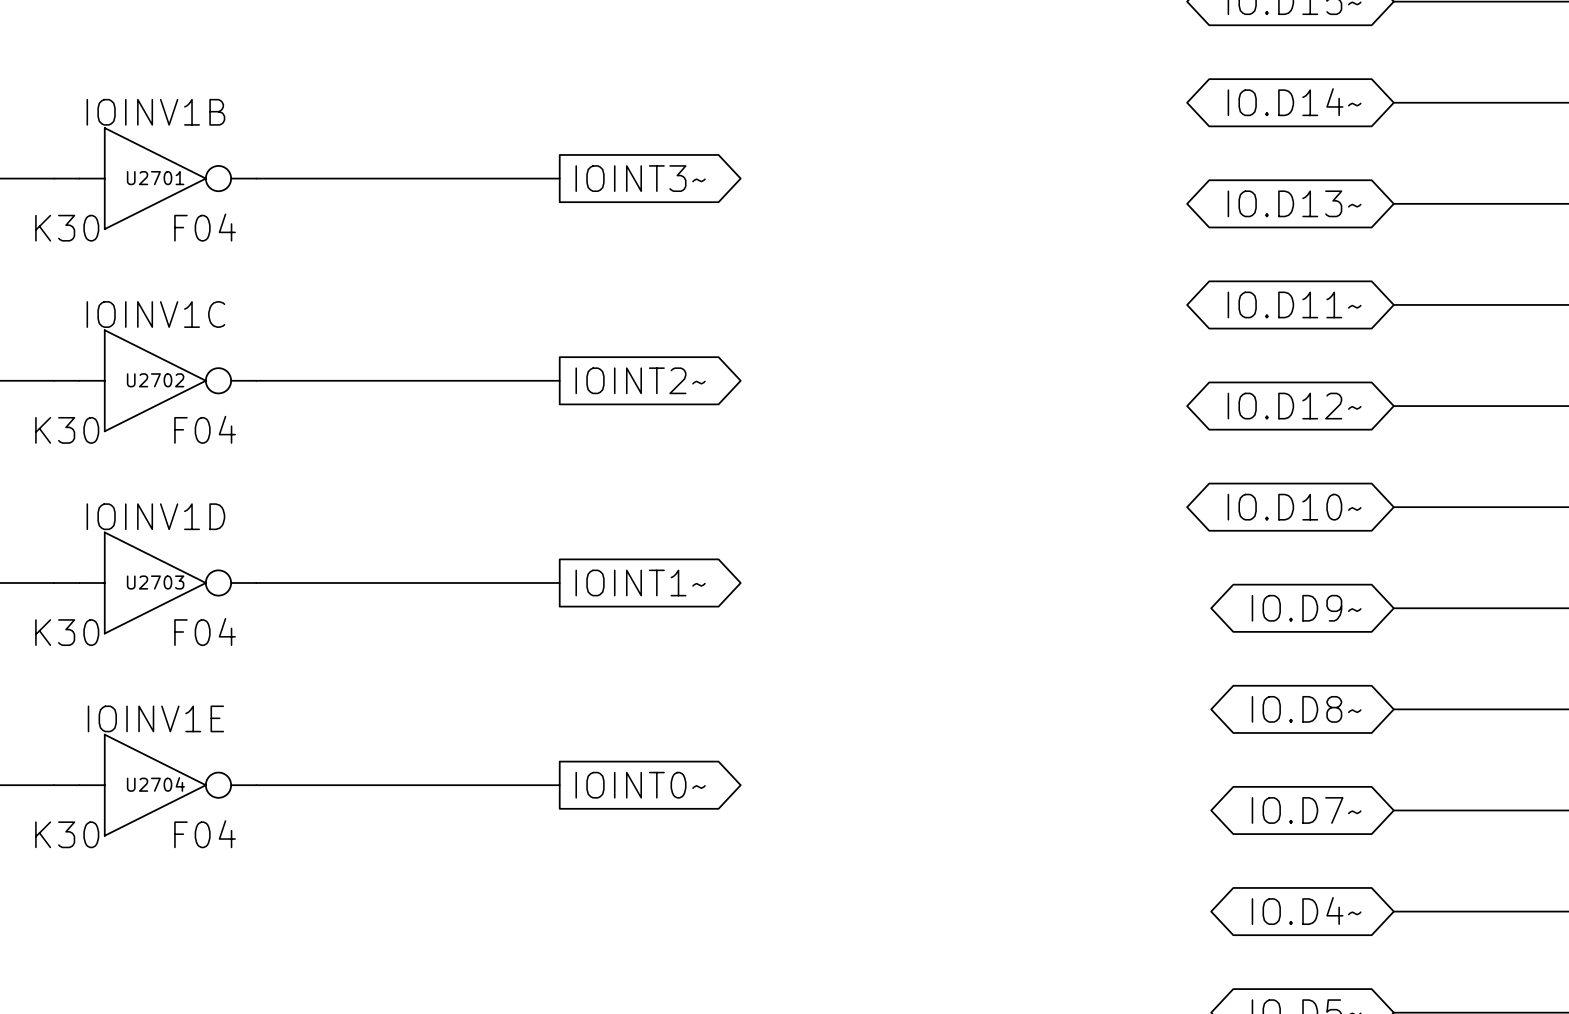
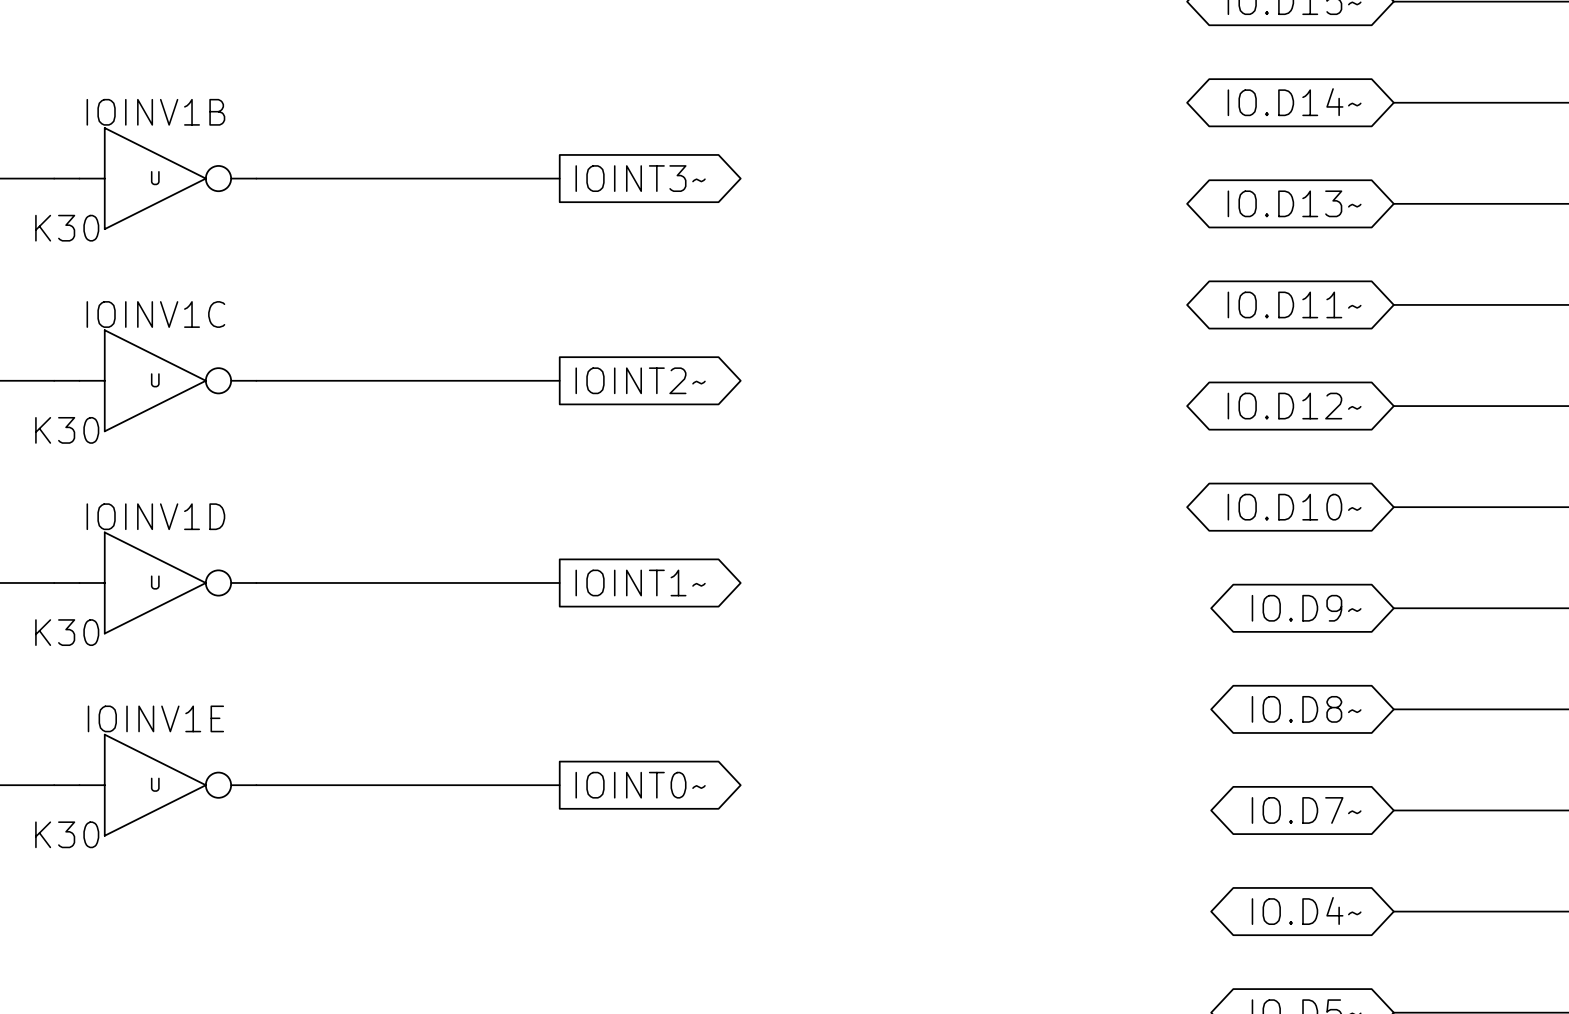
U2701 name: U2701 (155, 178) -> U (155, 178)
U2701 value: F04 (205, 227) -> none
U2702 name: U2702 (155, 380) -> U (155, 380)
U2702 value: F04 (205, 429) -> none
U2703 name: U2703 (155, 582) -> U (155, 582)
U2703 value: F04 (205, 632) -> none
U2704 name: U2704 (155, 784) -> U (155, 784)
U2704 value: F04 (205, 834) -> none

